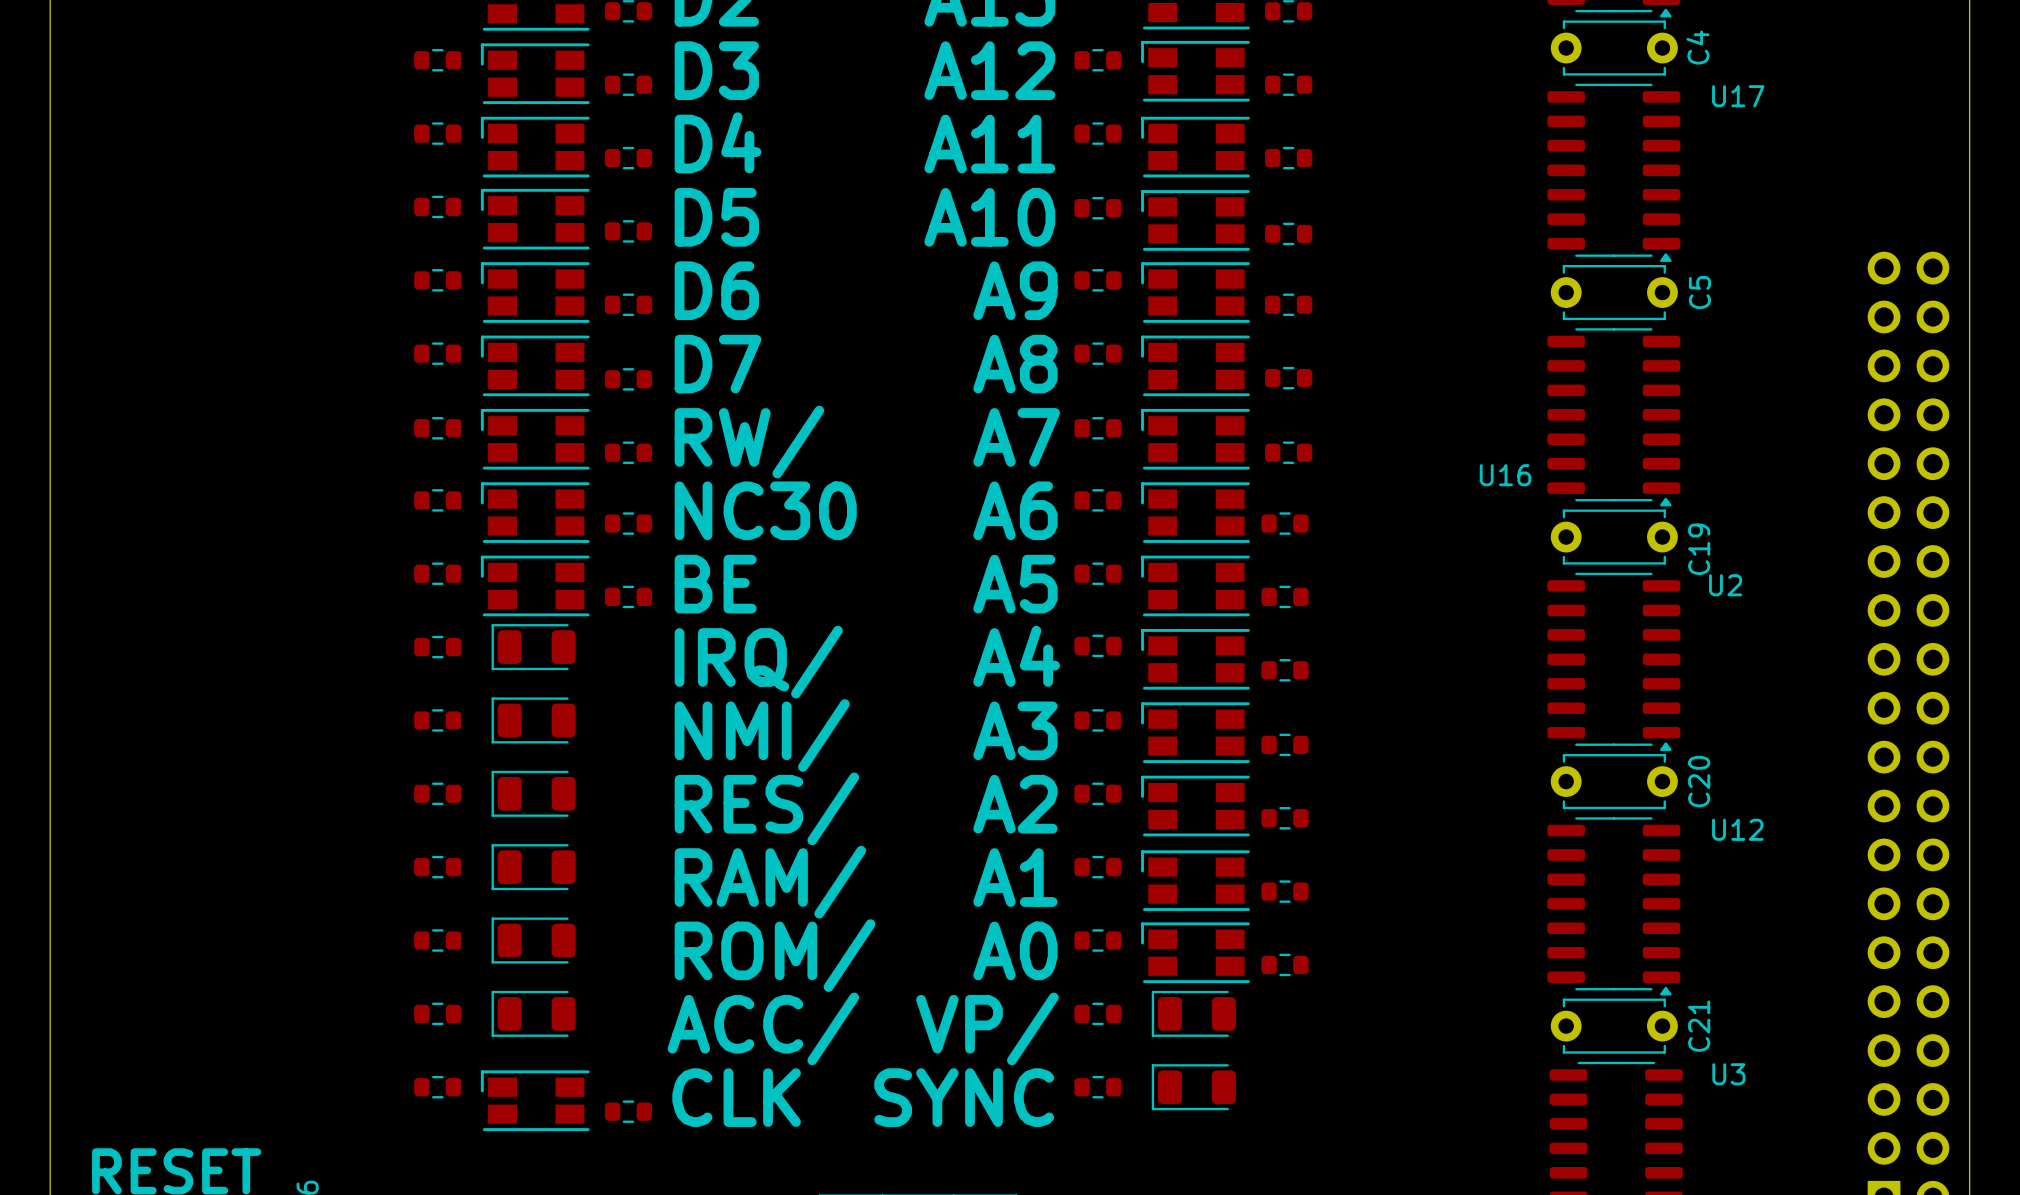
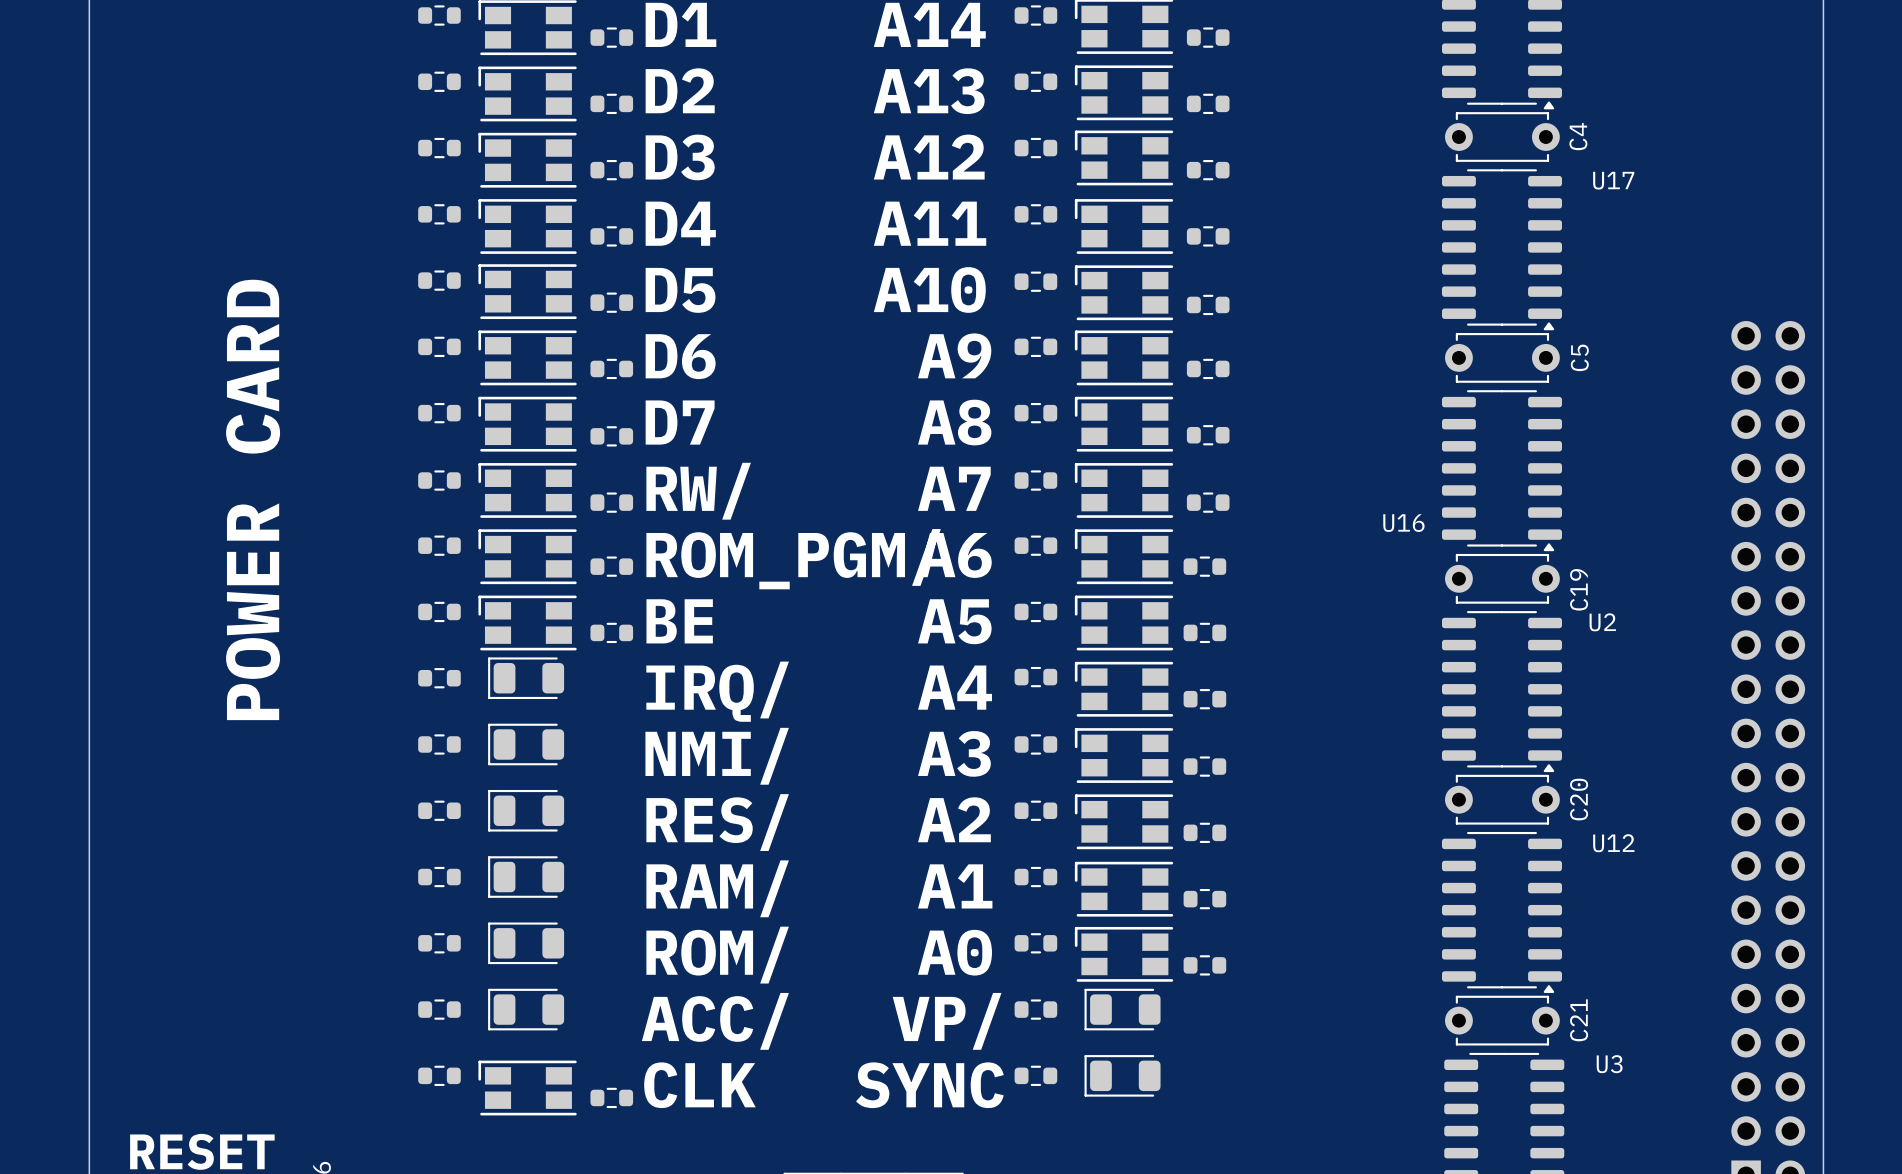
text: none -> POWER CARD (253, 499)
text: NC30 (765, 510) -> ROM_PGM/ (793, 559)

